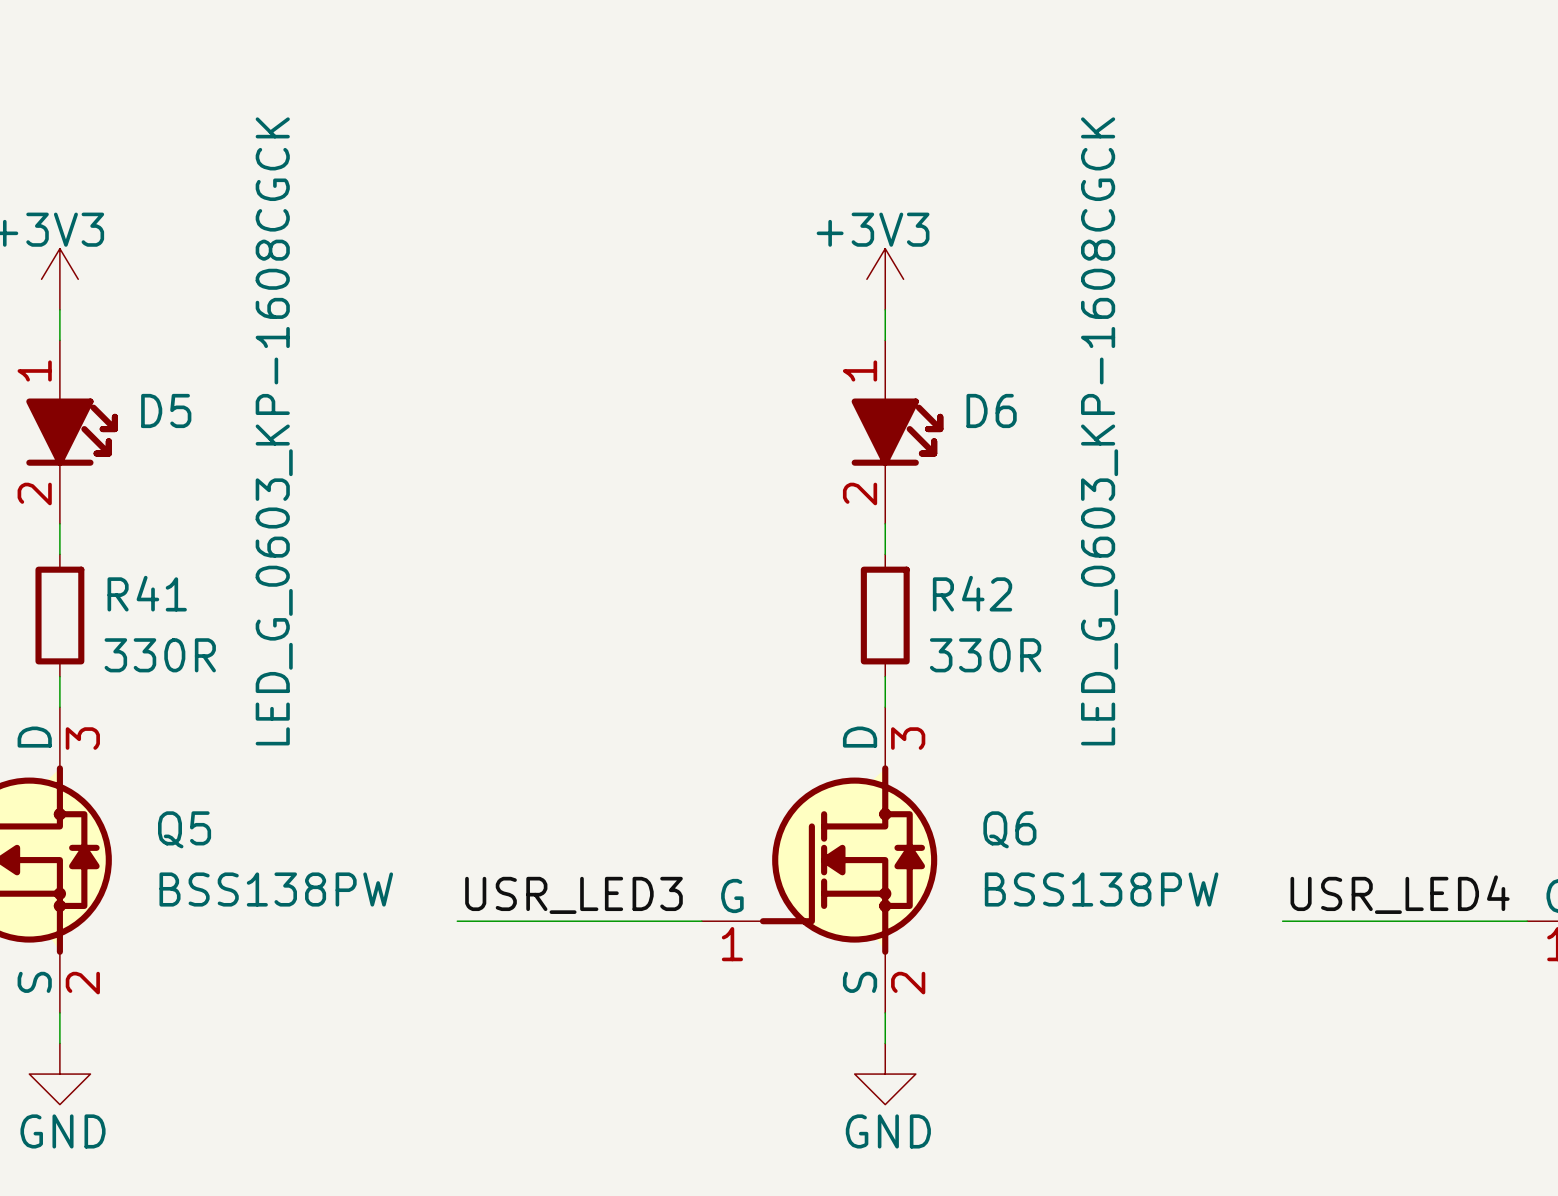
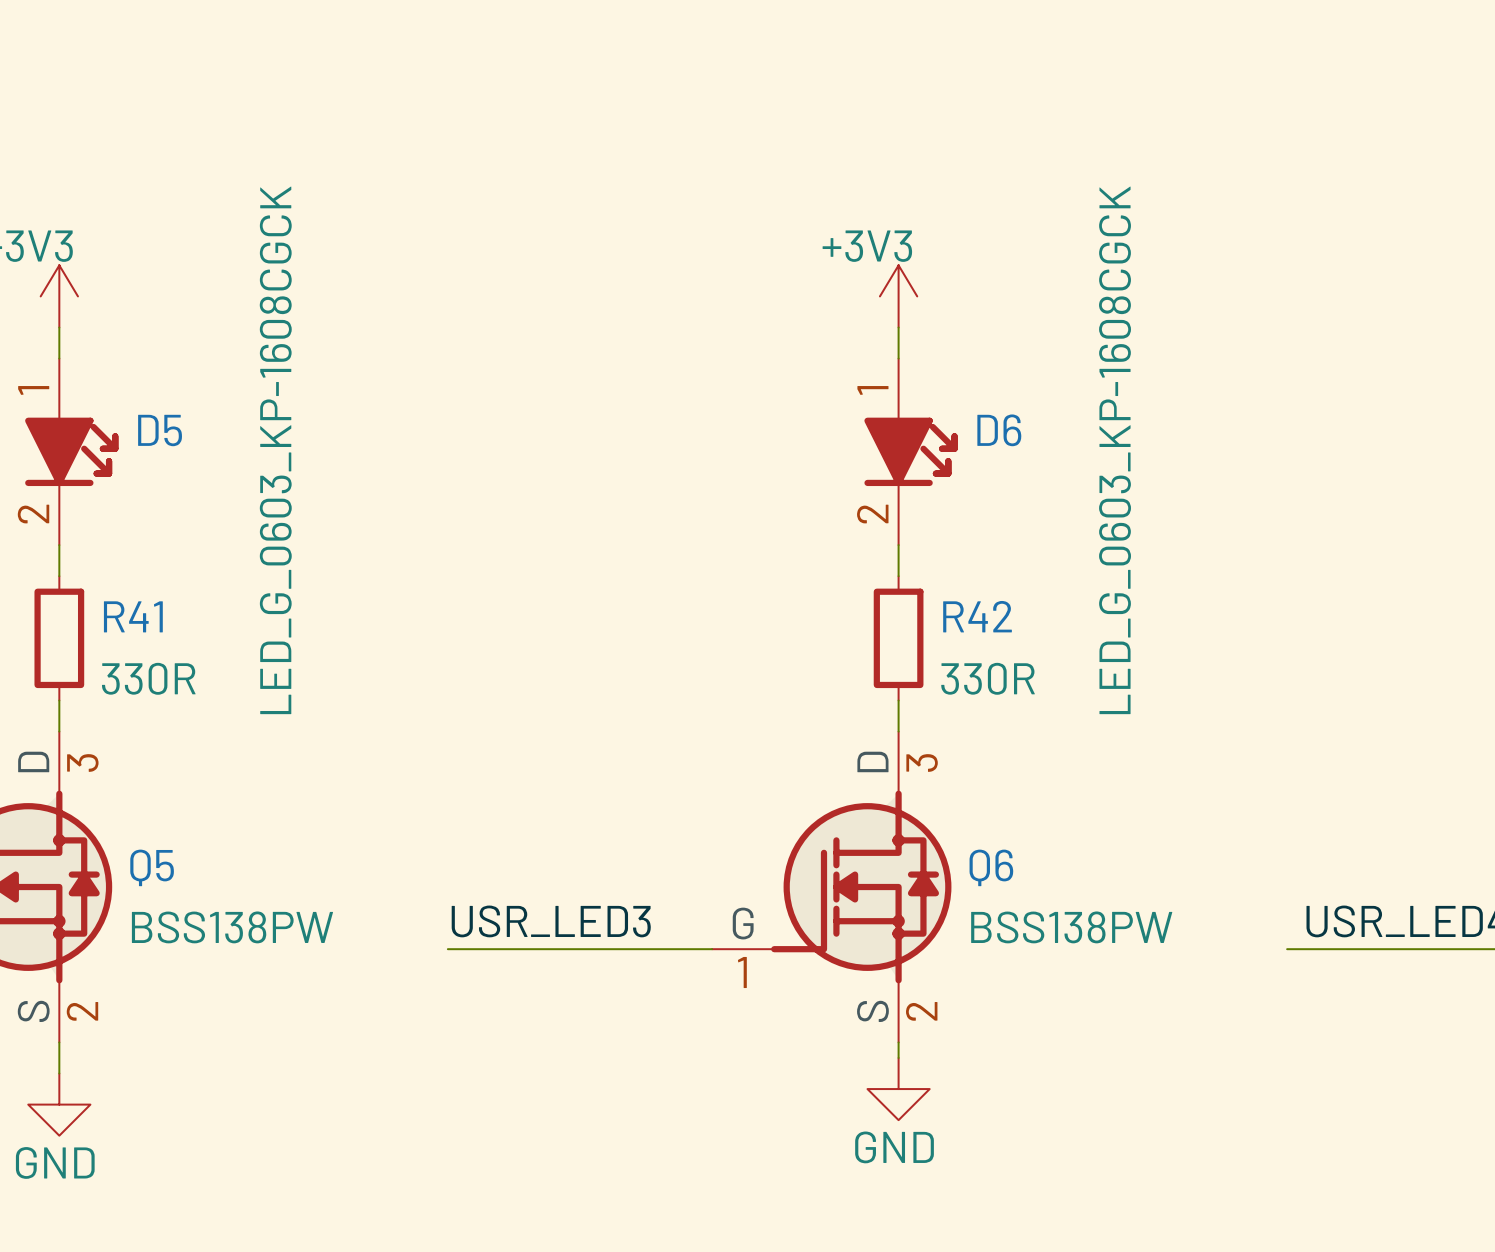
Q5 name position: Q5 (184, 829) -> Q5 (152, 867)
Q6 name position: Q6 (1009, 829) -> Q6 (991, 867)
Q5 text: BSS138PW (276, 889) -> none
Q6 text: BSS138PW (1101, 889) -> none
label position: USR_LED3 (573, 895) -> USR_LED3 (551, 921)
Q5 value: none -> BSS138PW (232, 927)
Q6 value: none -> BSS138PW (1071, 927)
wire: none -> (447, 949) (463, 949)
wire: none -> (1287, 949) (1302, 949)
power symbol position: GND (885, 1074) -> GND (898, 1089)

